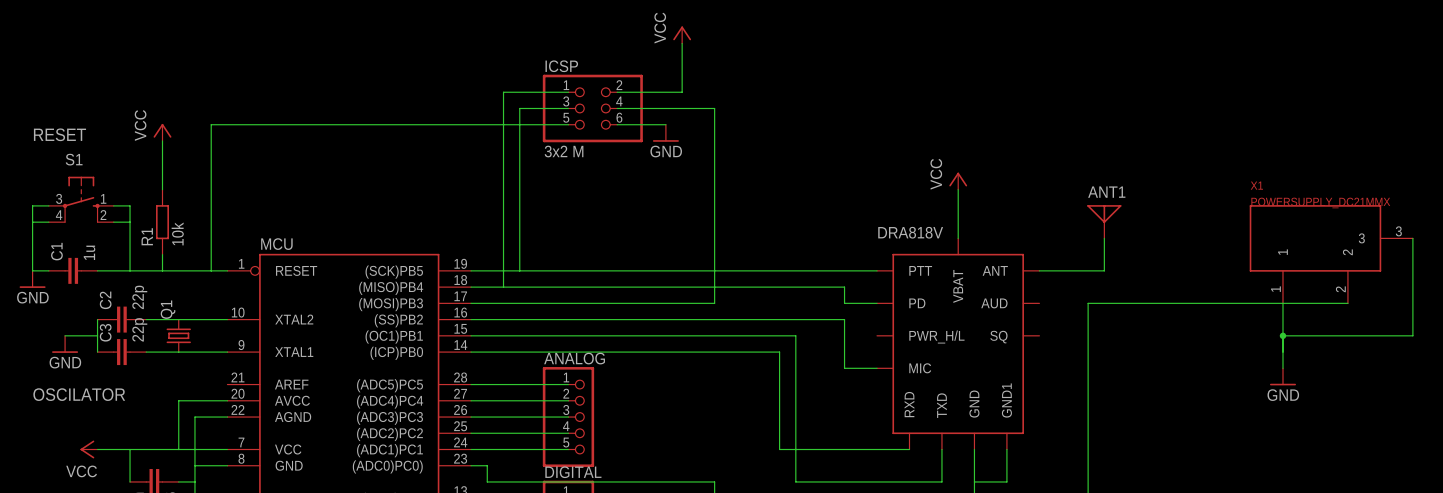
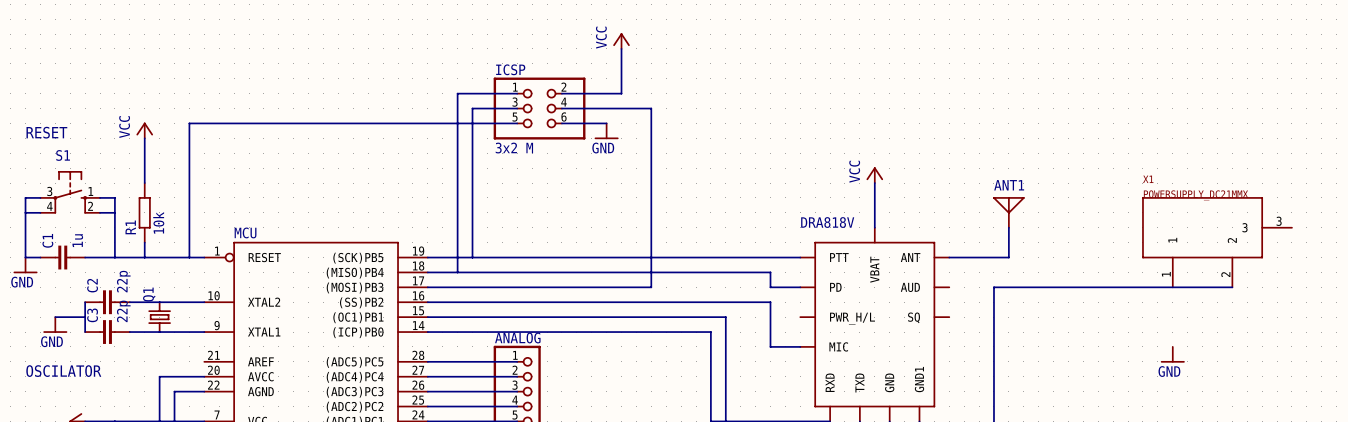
wire: (1412, 238) (1412, 335) (1282, 335) -> none
wire: (1282, 303) (1282, 368) -> none
junction: (1282, 335) -> none

